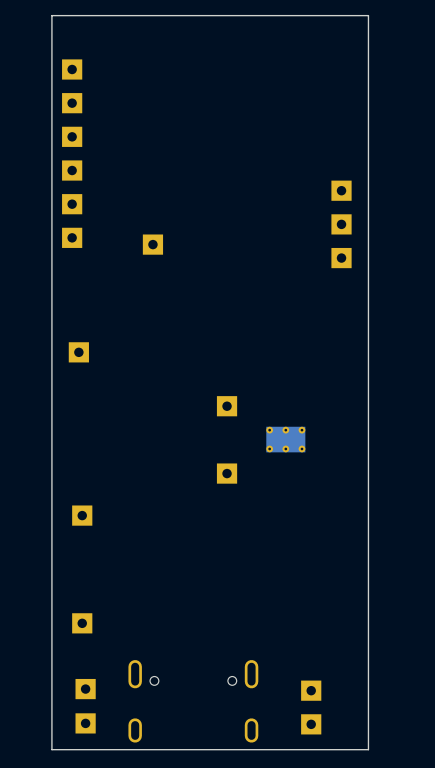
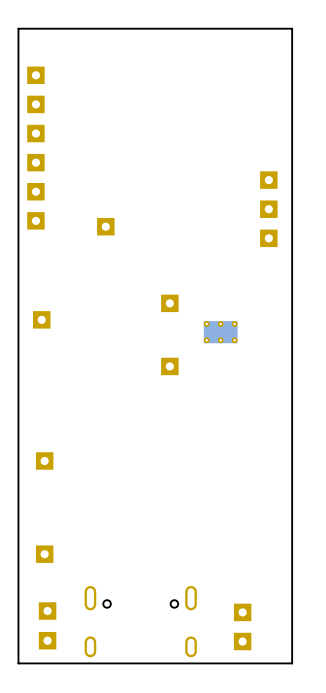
part position: (285, 439) -> (220, 332)
part position: (227, 473) -> (169, 303)

